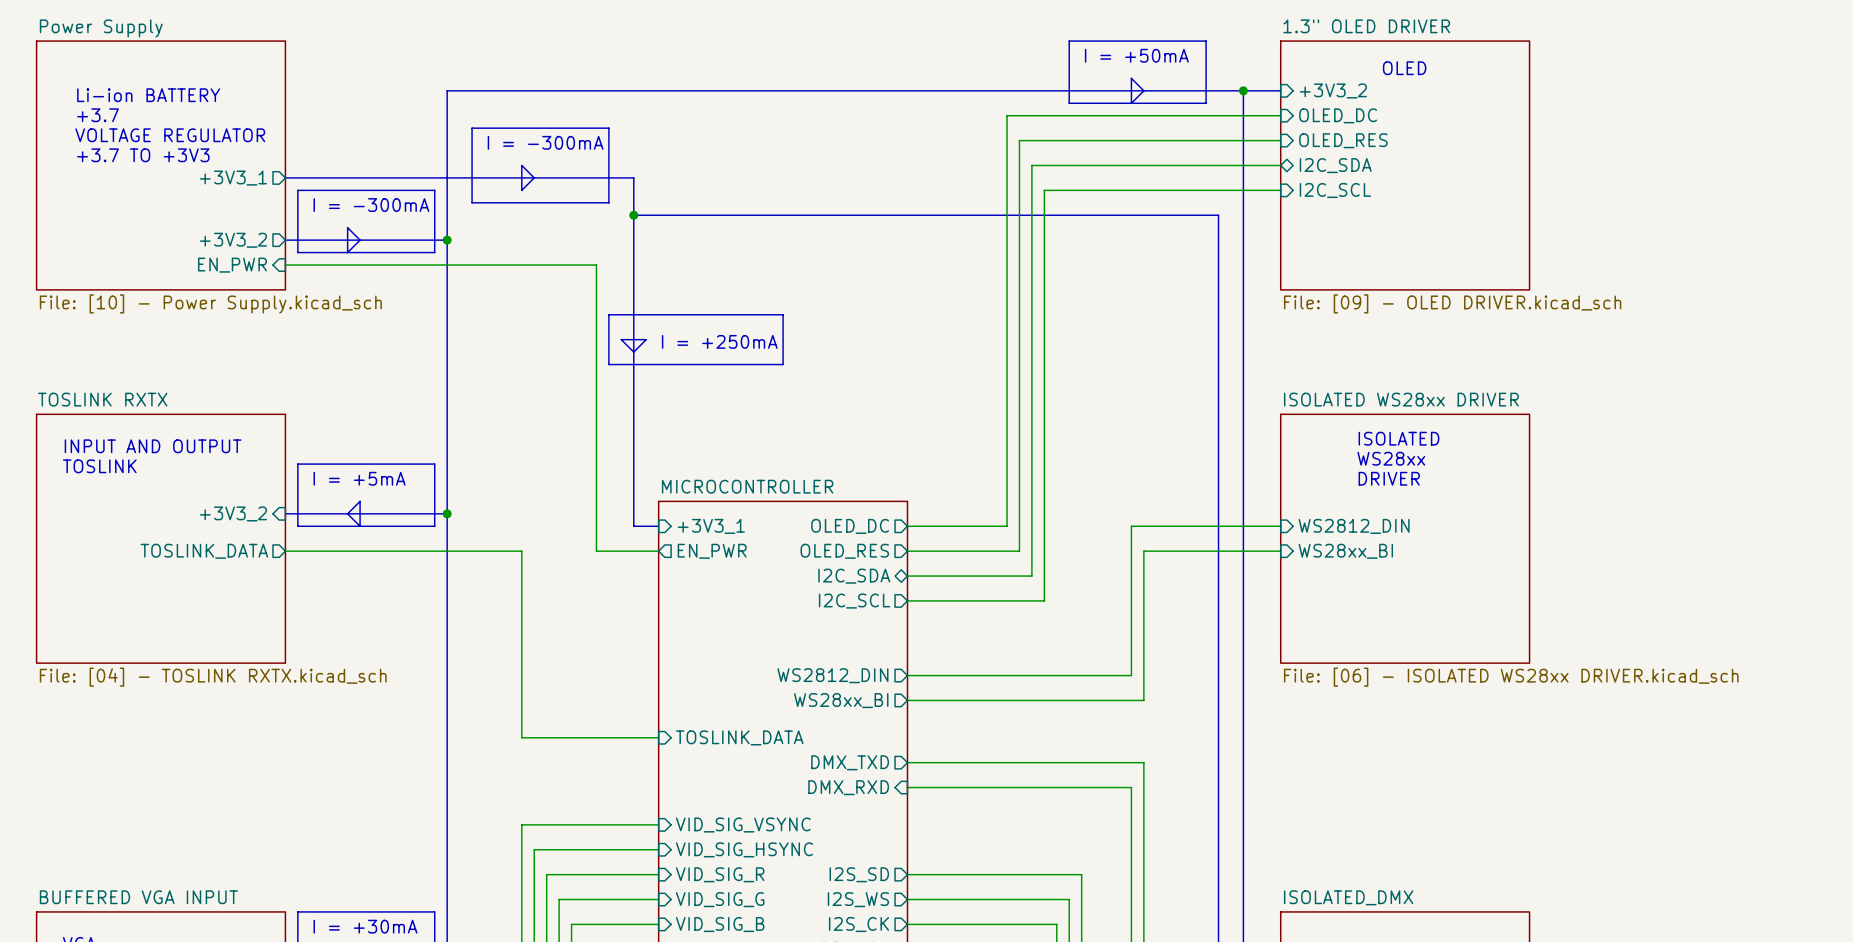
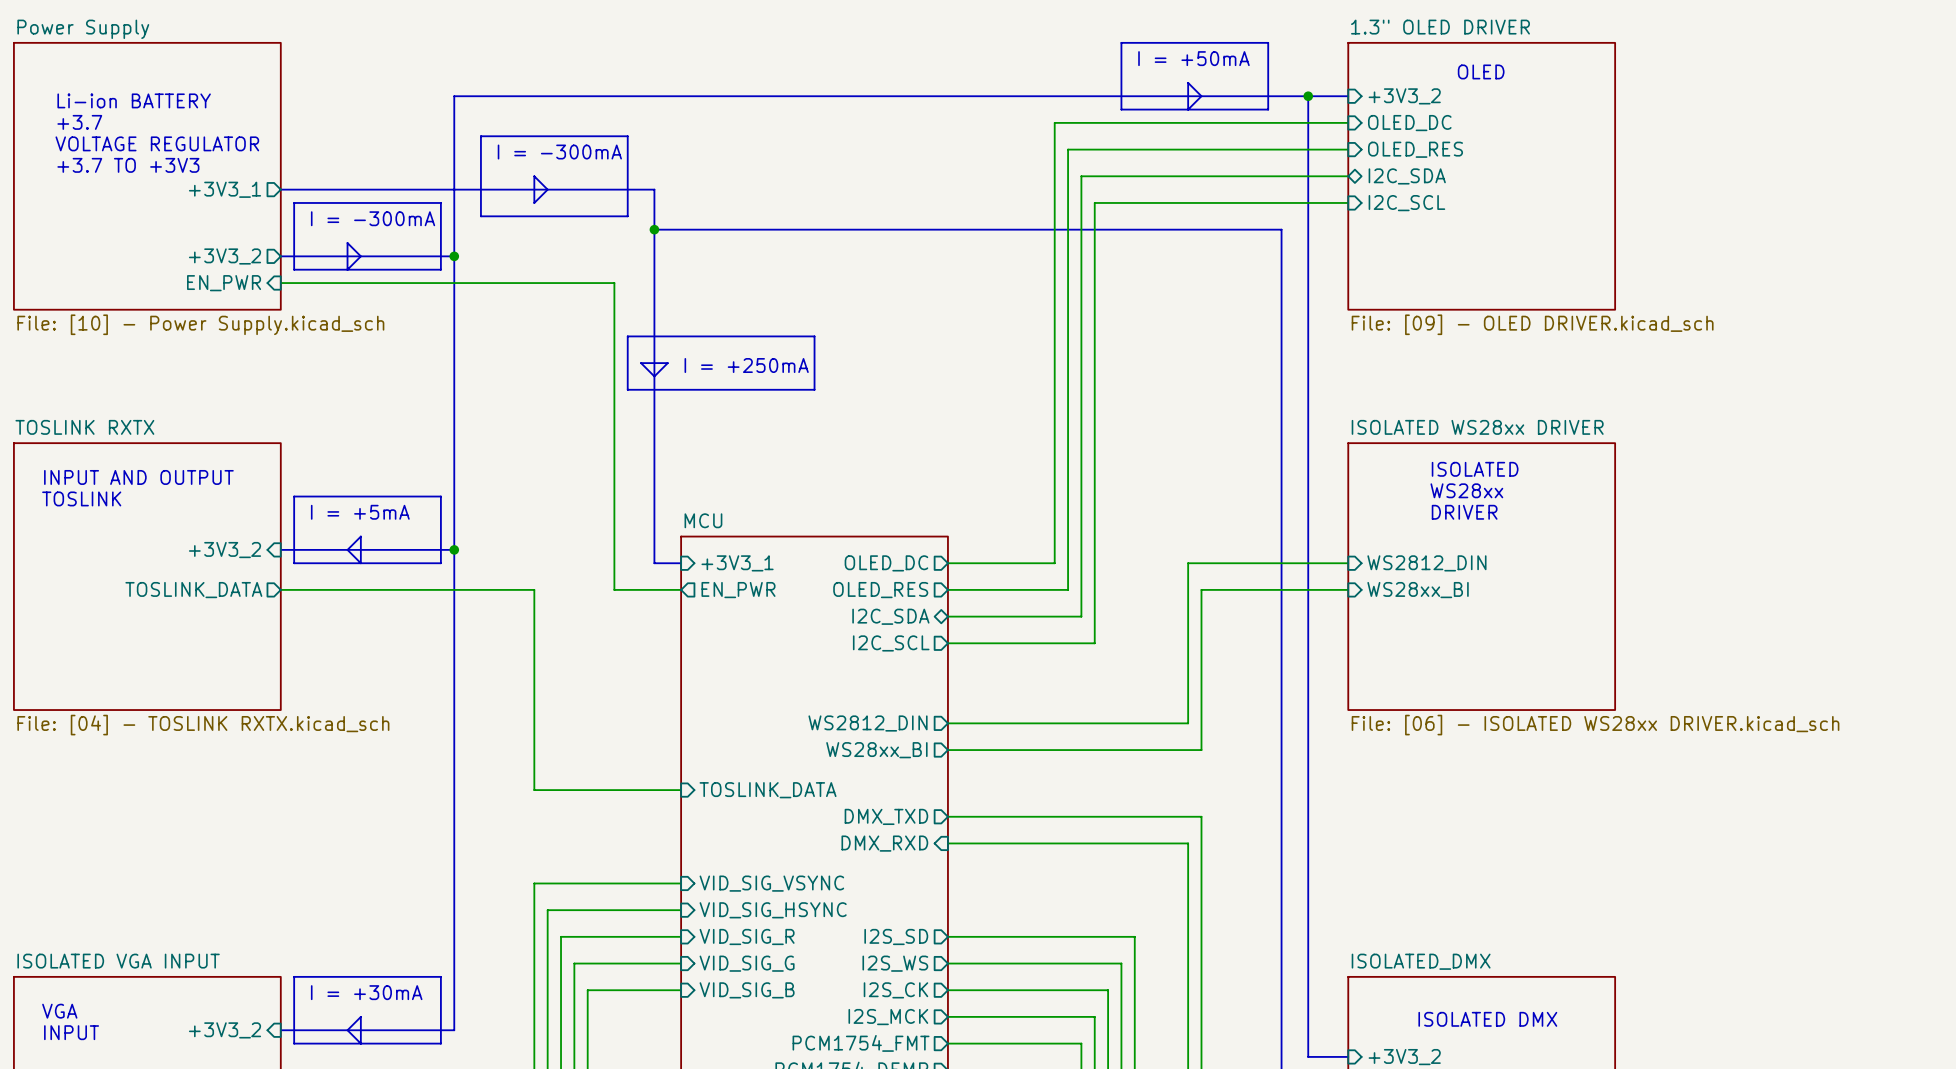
sheet MICROCONTROLLER name: MICROCONTROLLER (747, 486) -> MCU (703, 520)
sheet BUFFERED VGA INPUT name: BUFFERED VGA INPUT (138, 897) -> ISOLATED VGA INPUT (118, 961)

